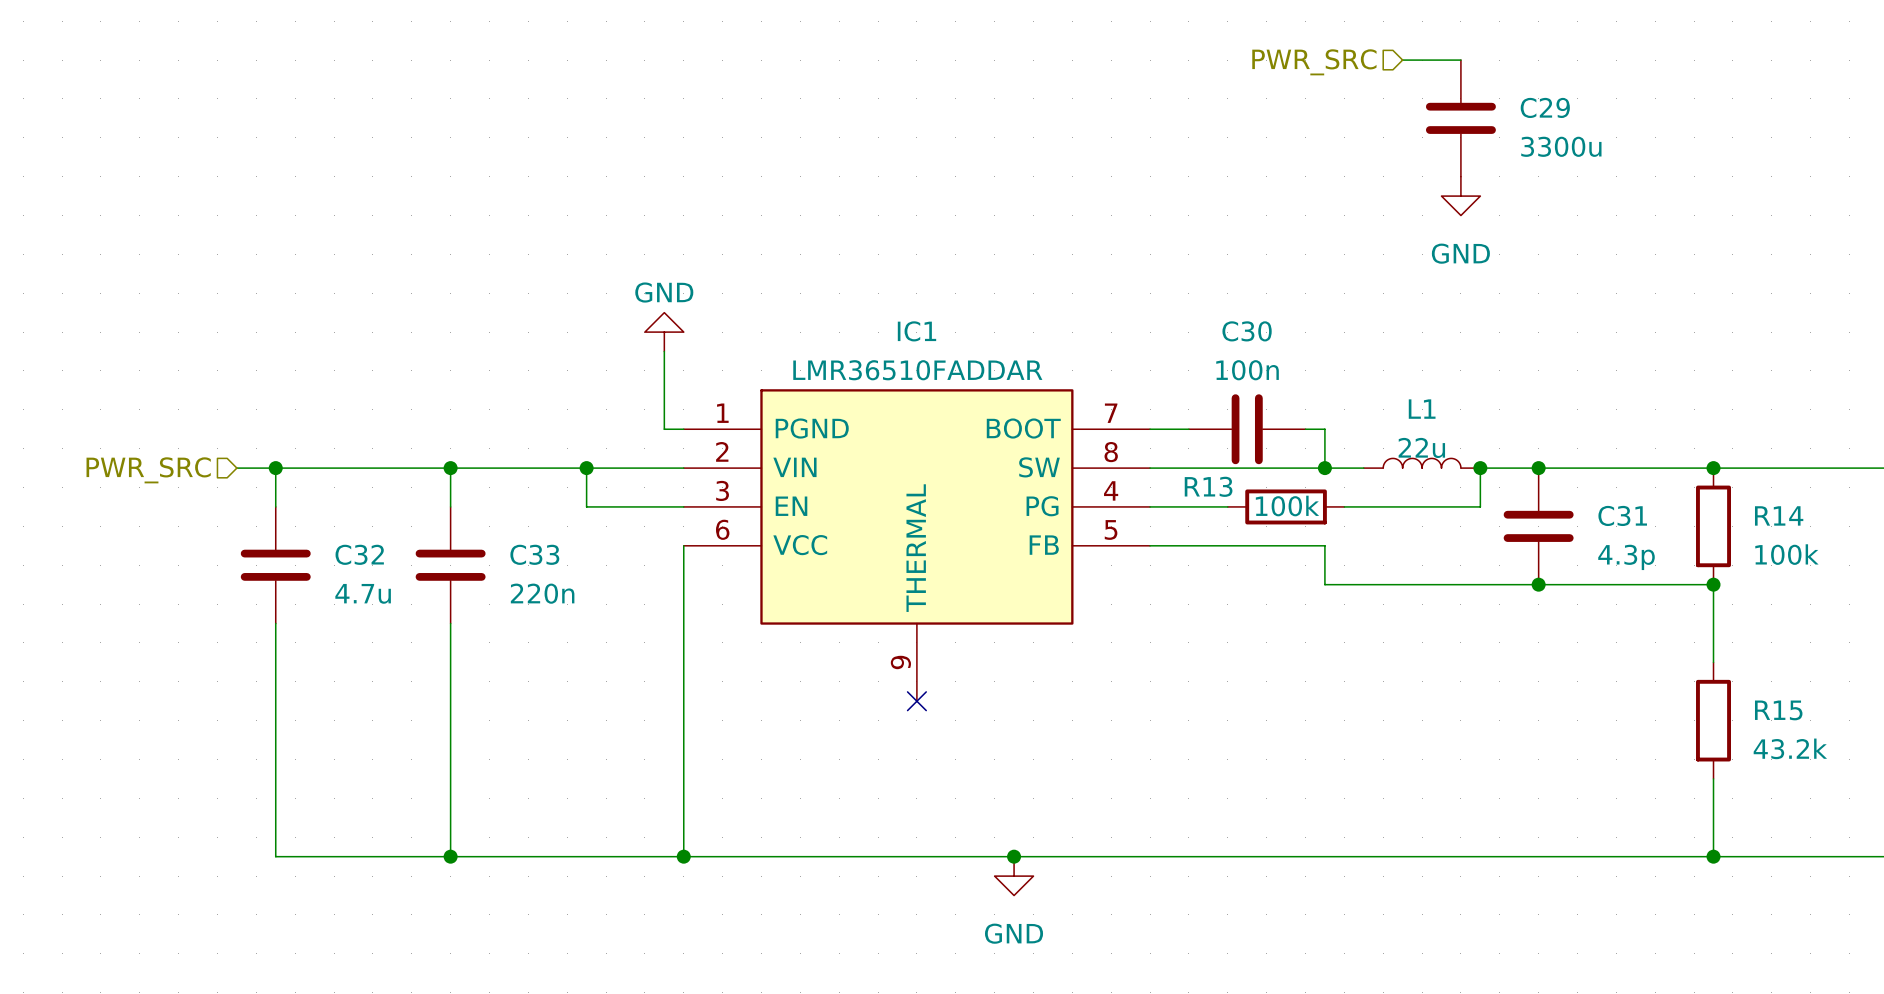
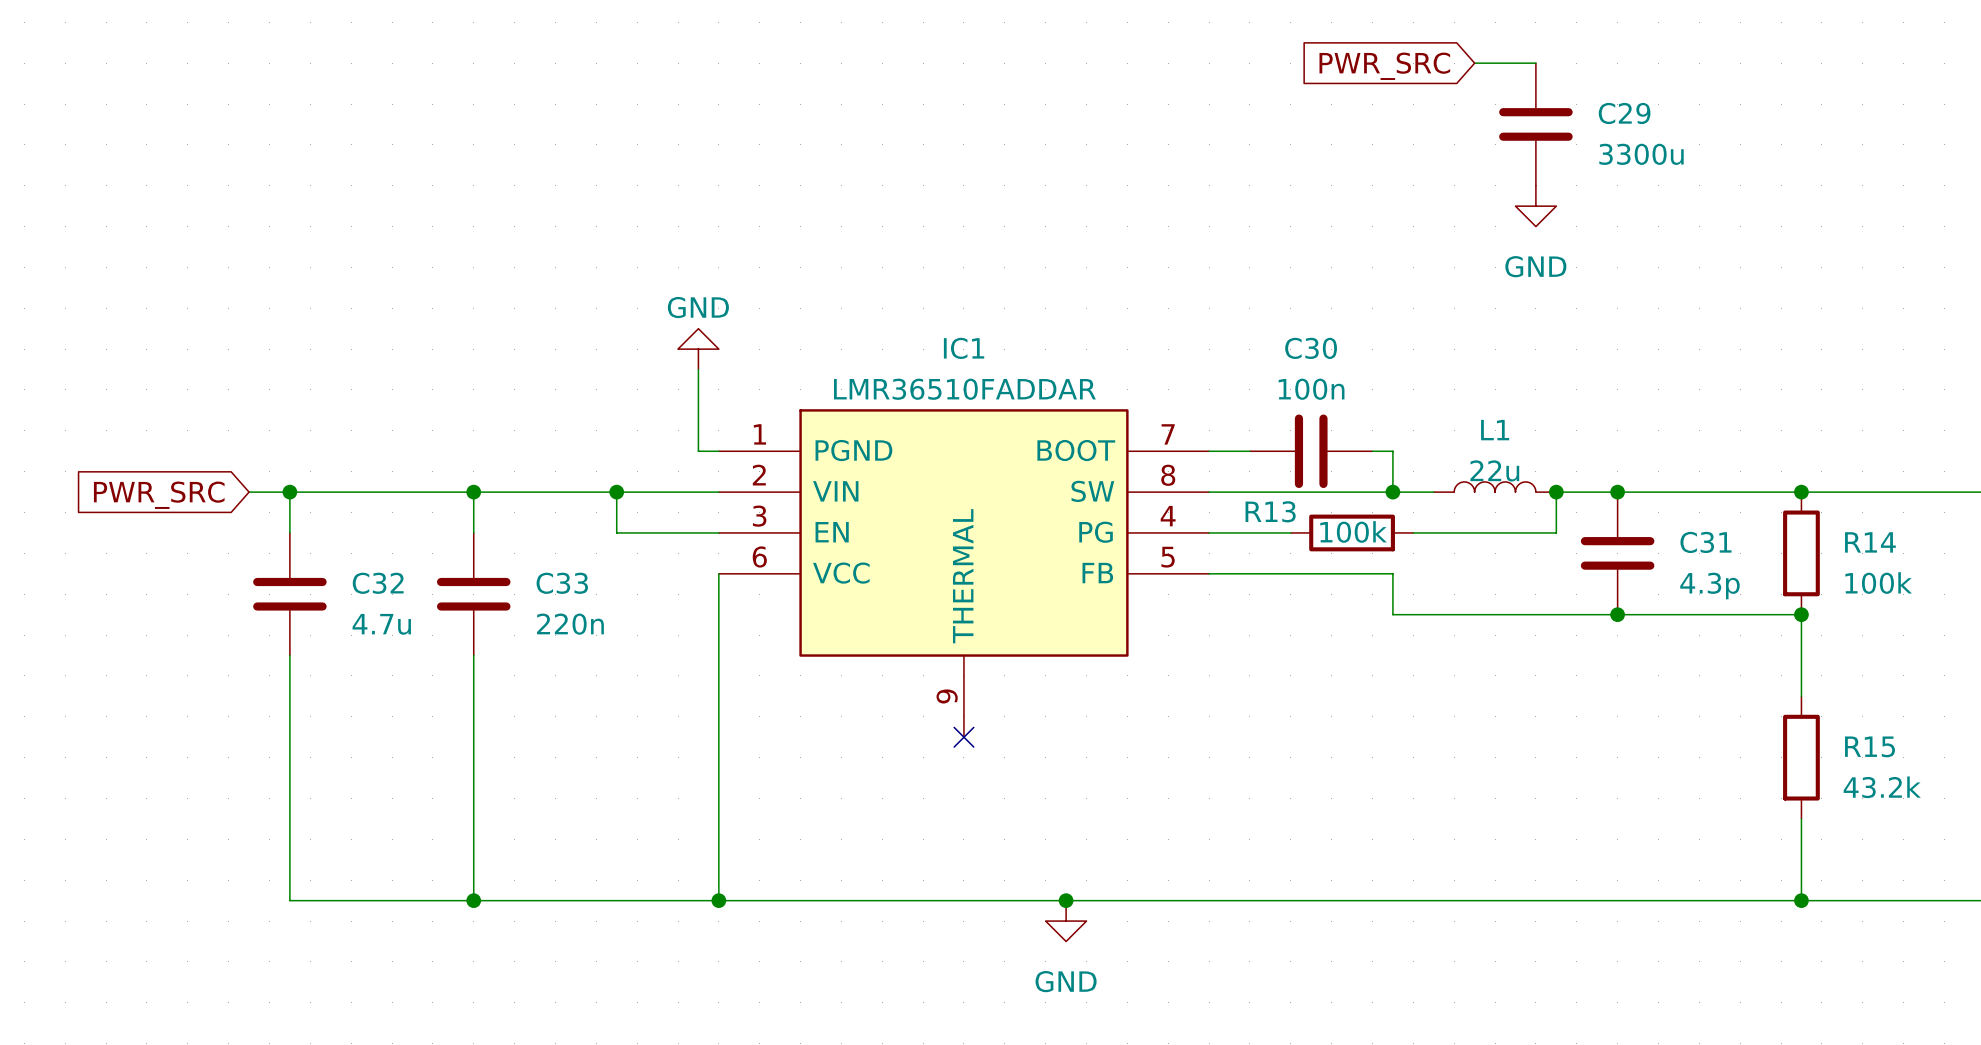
hierarchical label: PWR_SRC (1314, 62) -> none
global label: none -> PWR_SRC (1384, 66)
hierarchical label: PWR_SRC (148, 470) -> none
global label: none -> PWR_SRC (159, 495)

